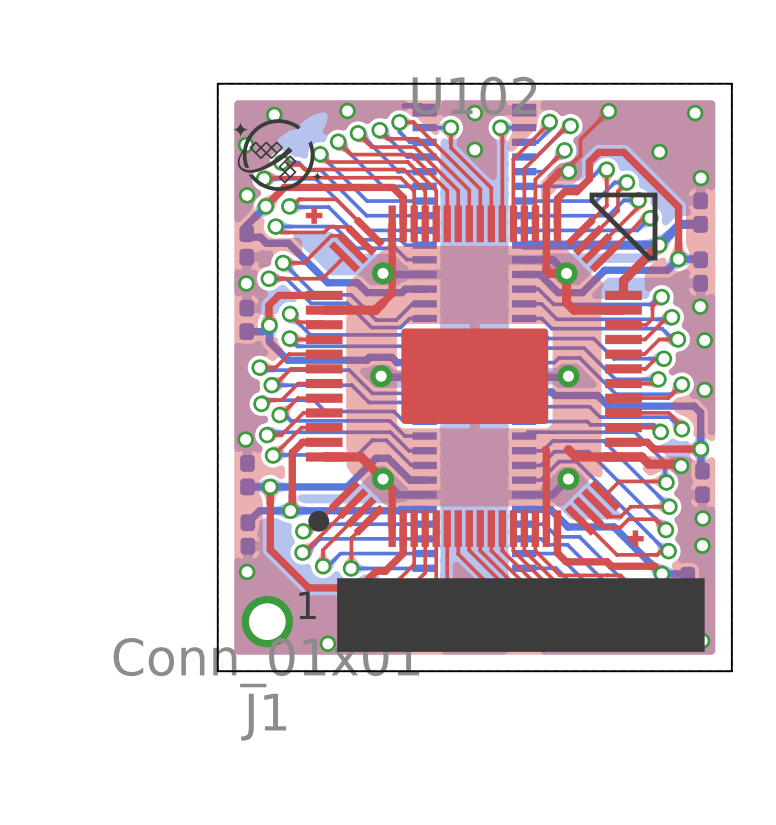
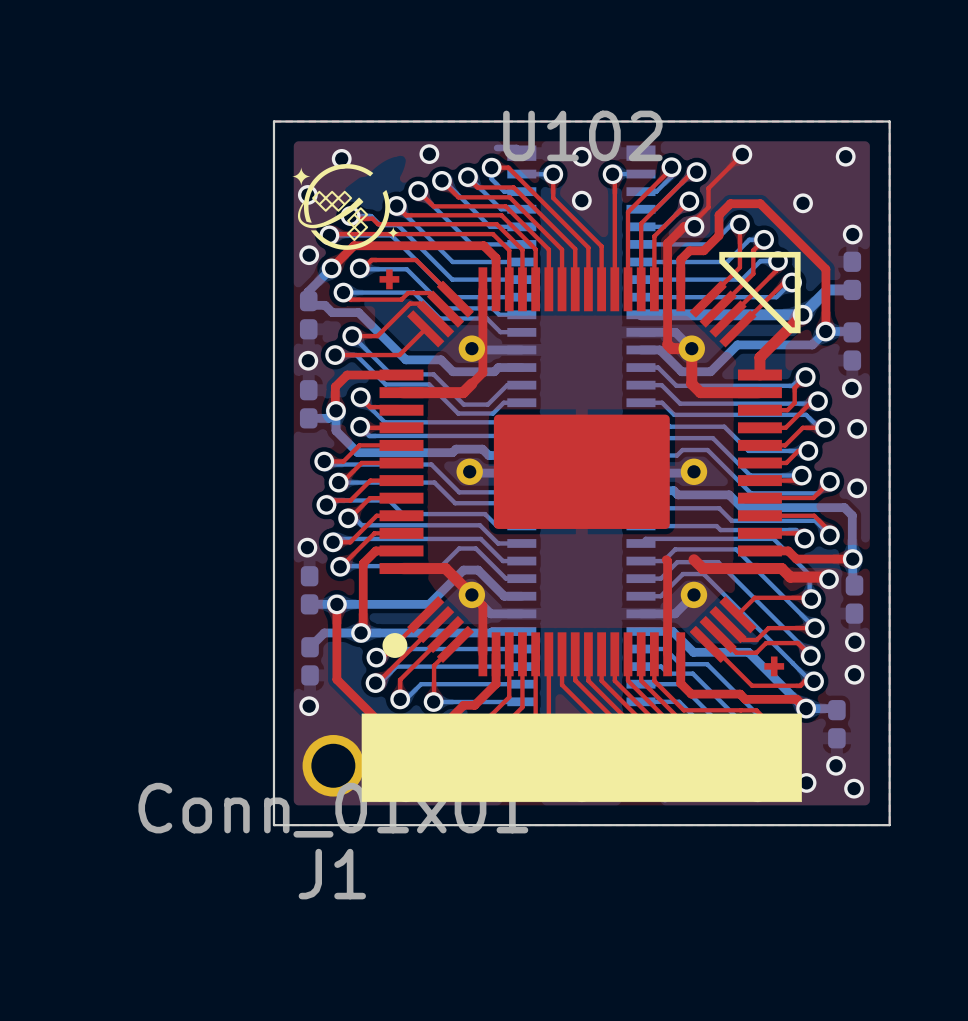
text: 1 (307, 605) -> none
drawing position: (520, 615) -> (581, 757)

